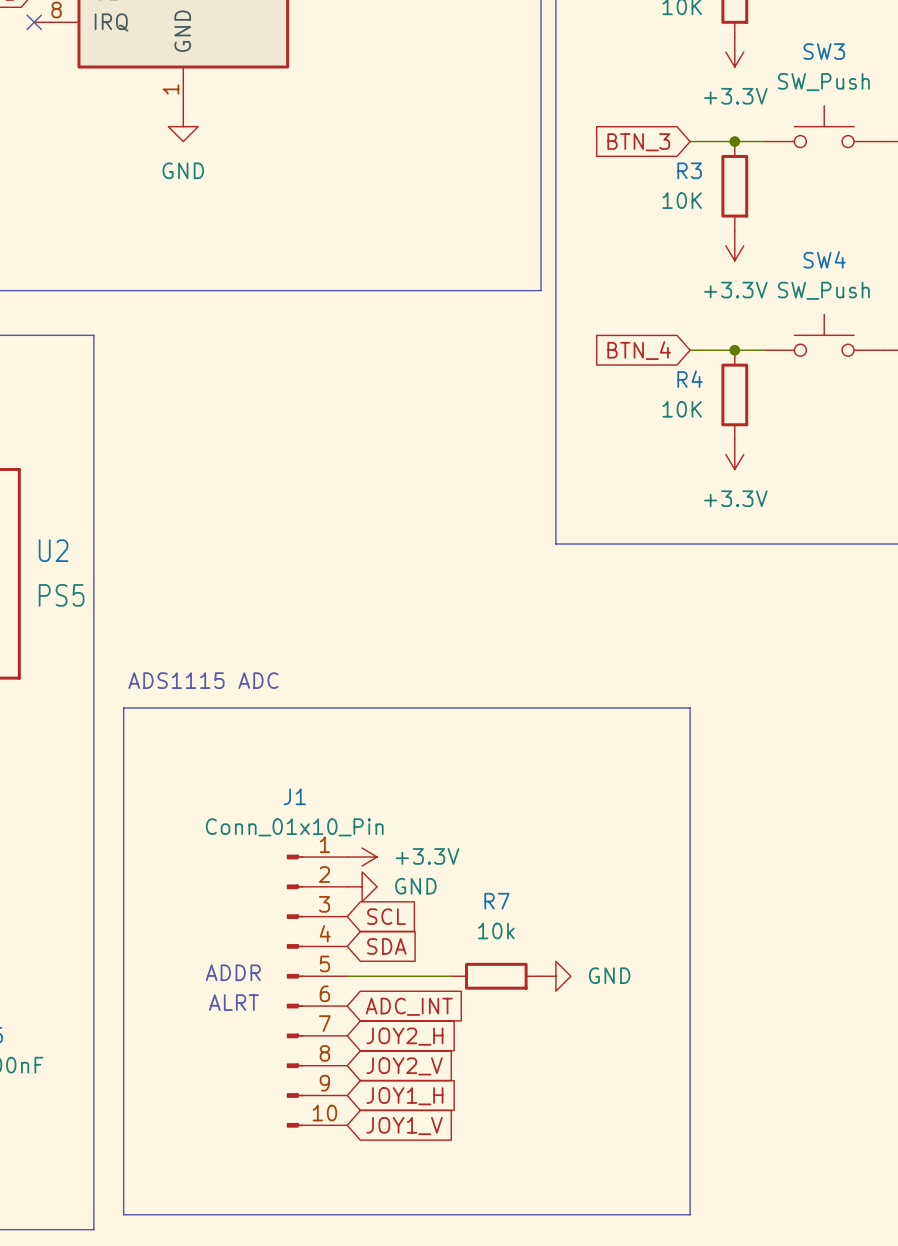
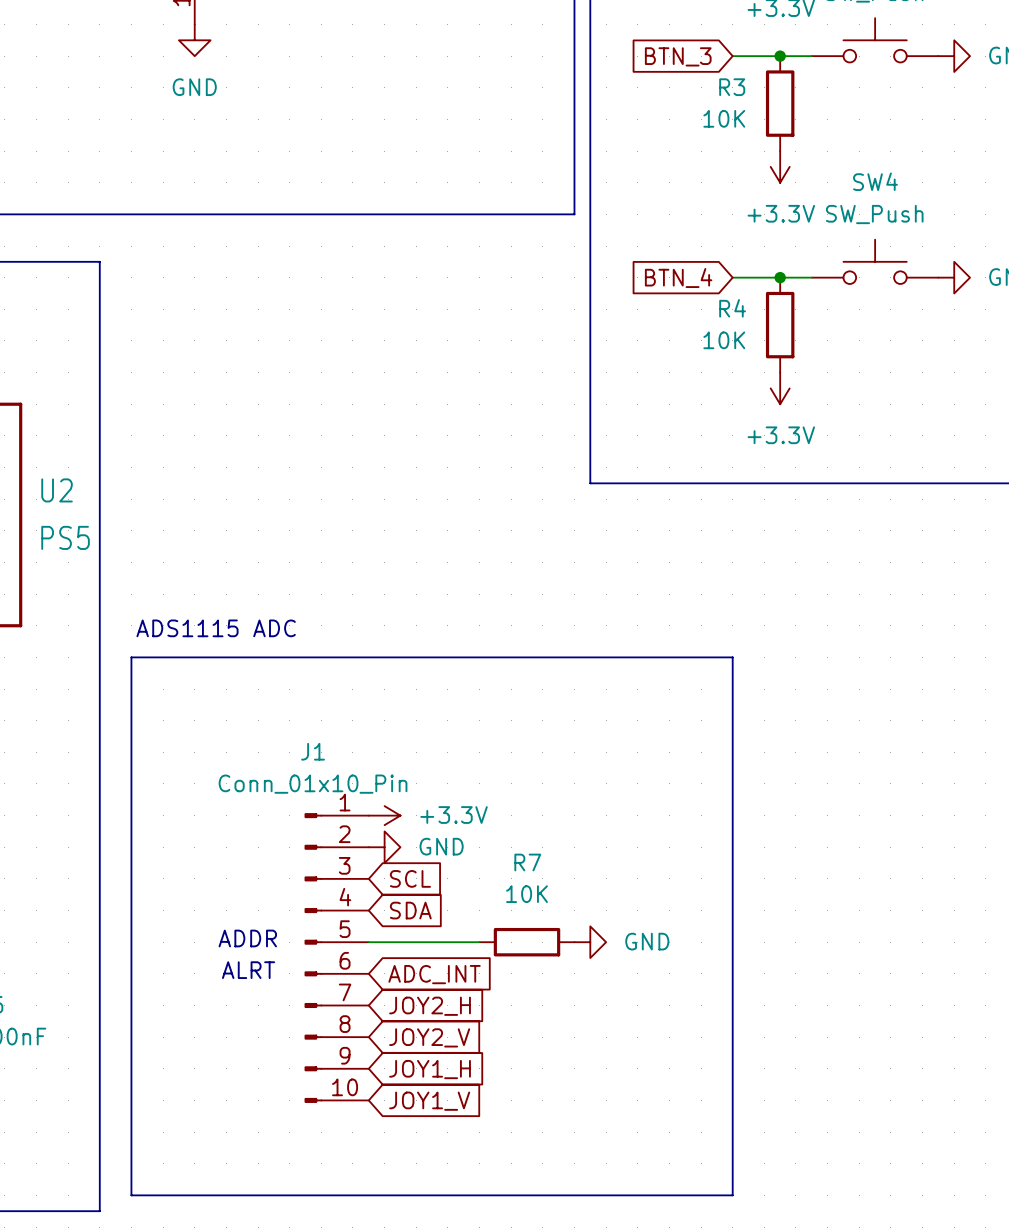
R7 value: 10k (496, 930) -> 10K (527, 894)

